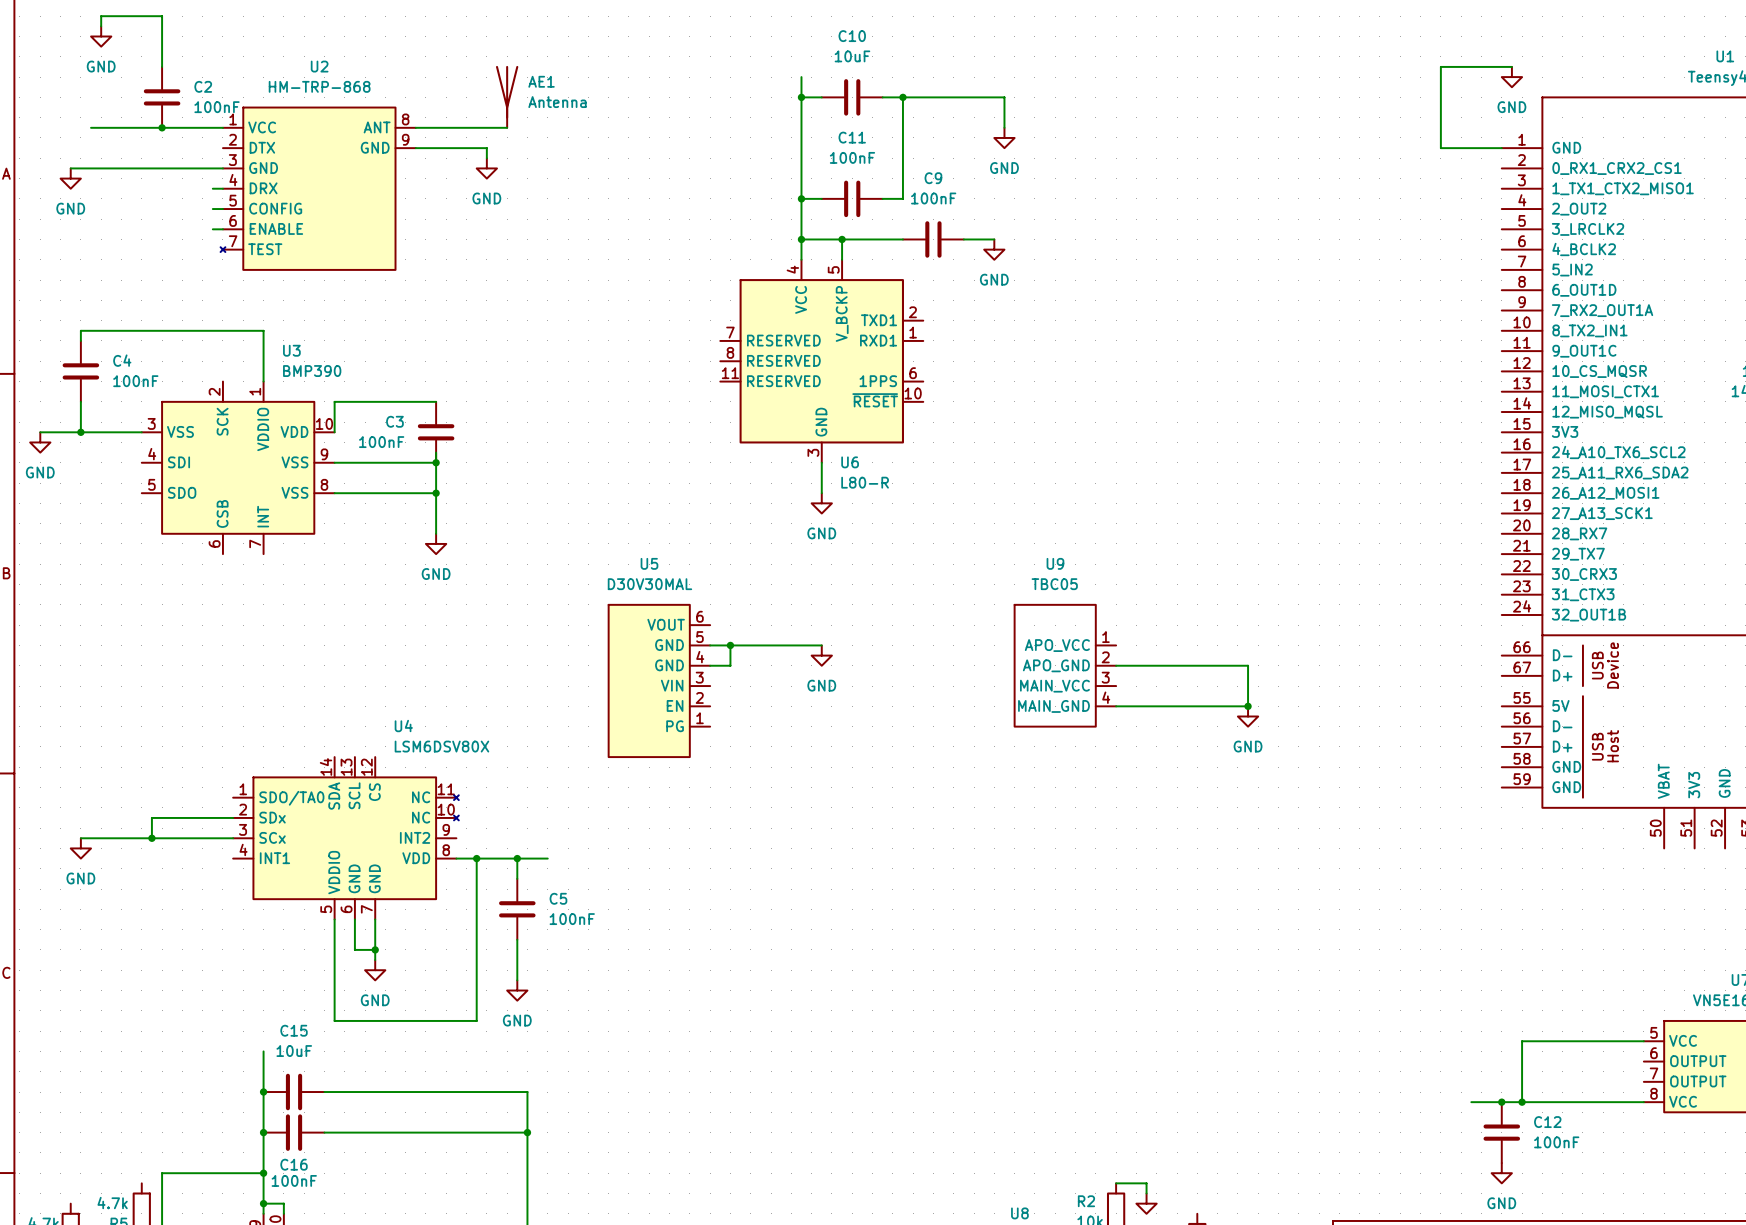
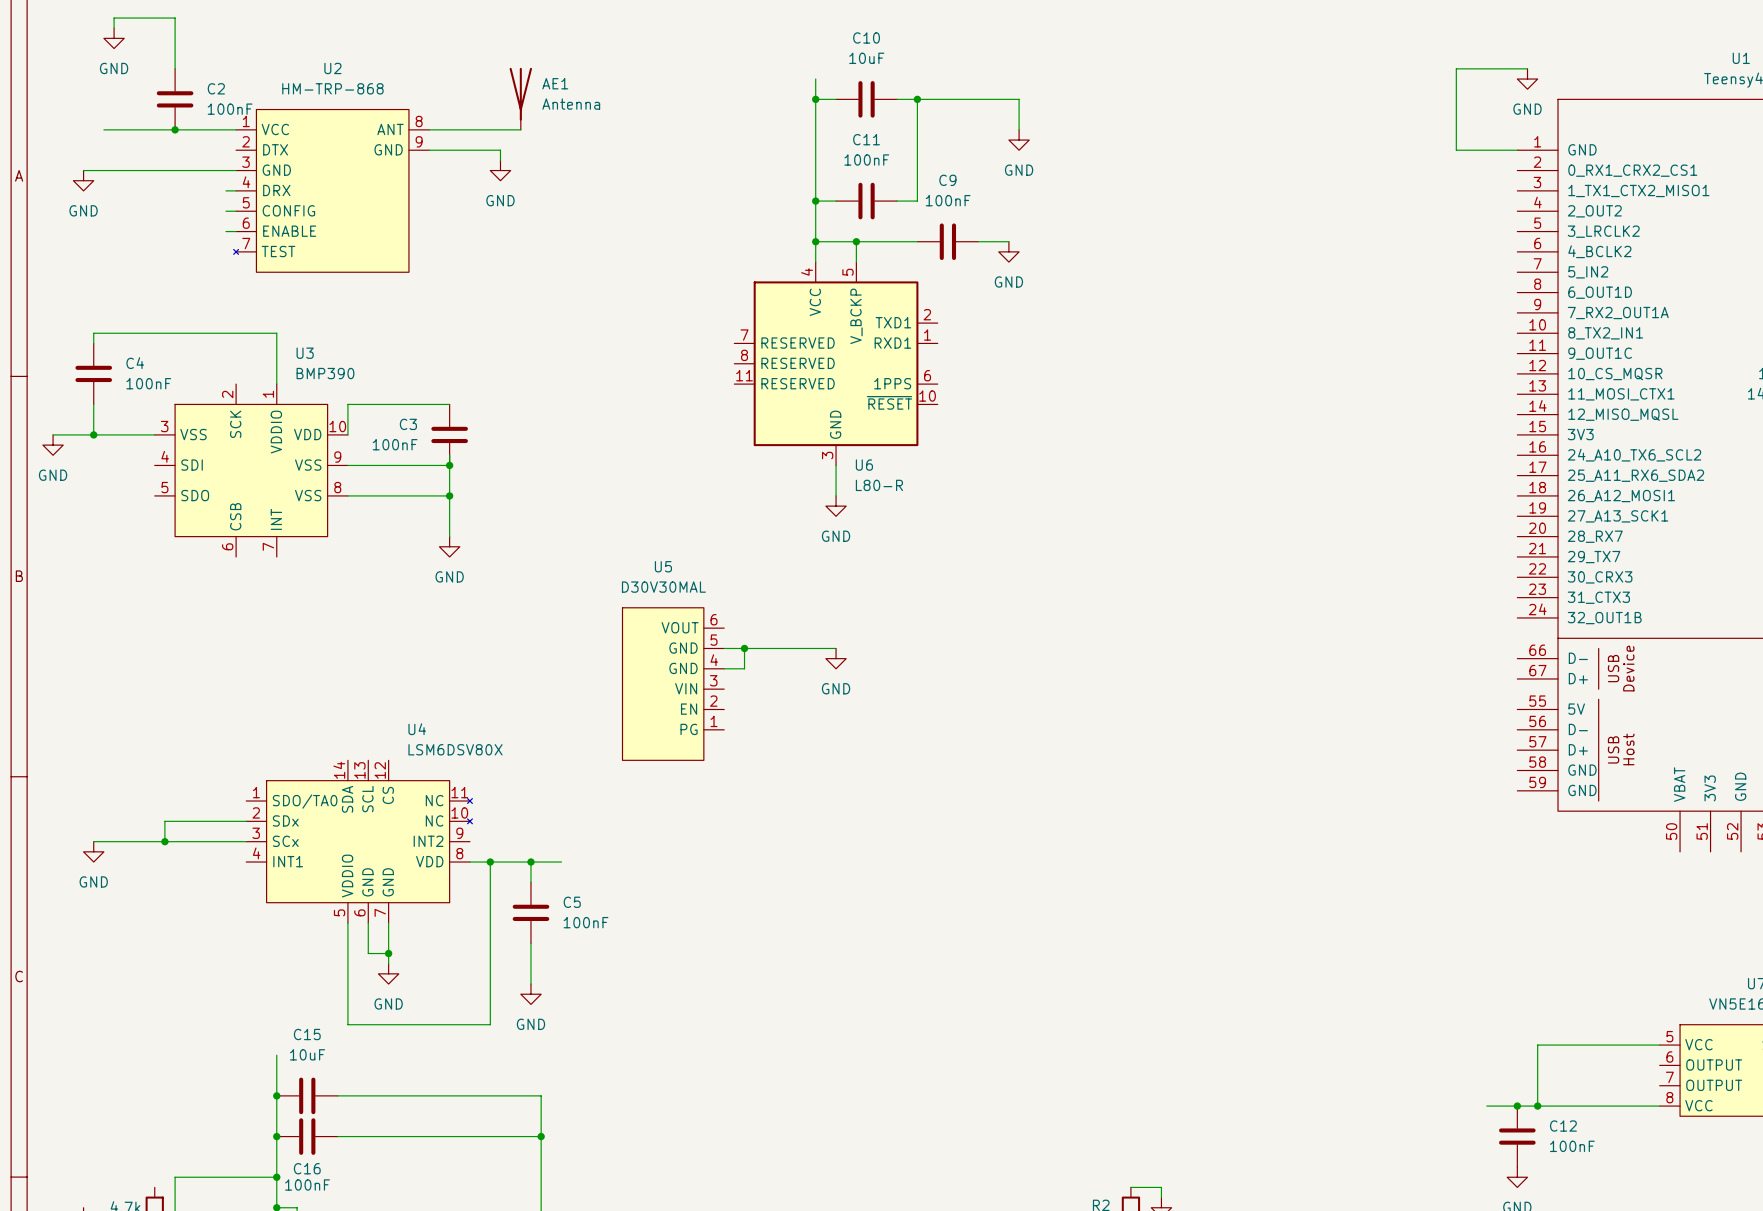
U9: TBC05 (1065, 665) -> none
wire: (1116, 665) (1248, 665) (1248, 706) (1116, 706) -> none
junction: (1248, 706) -> none
power symbol: GND (1248, 716) -> none

